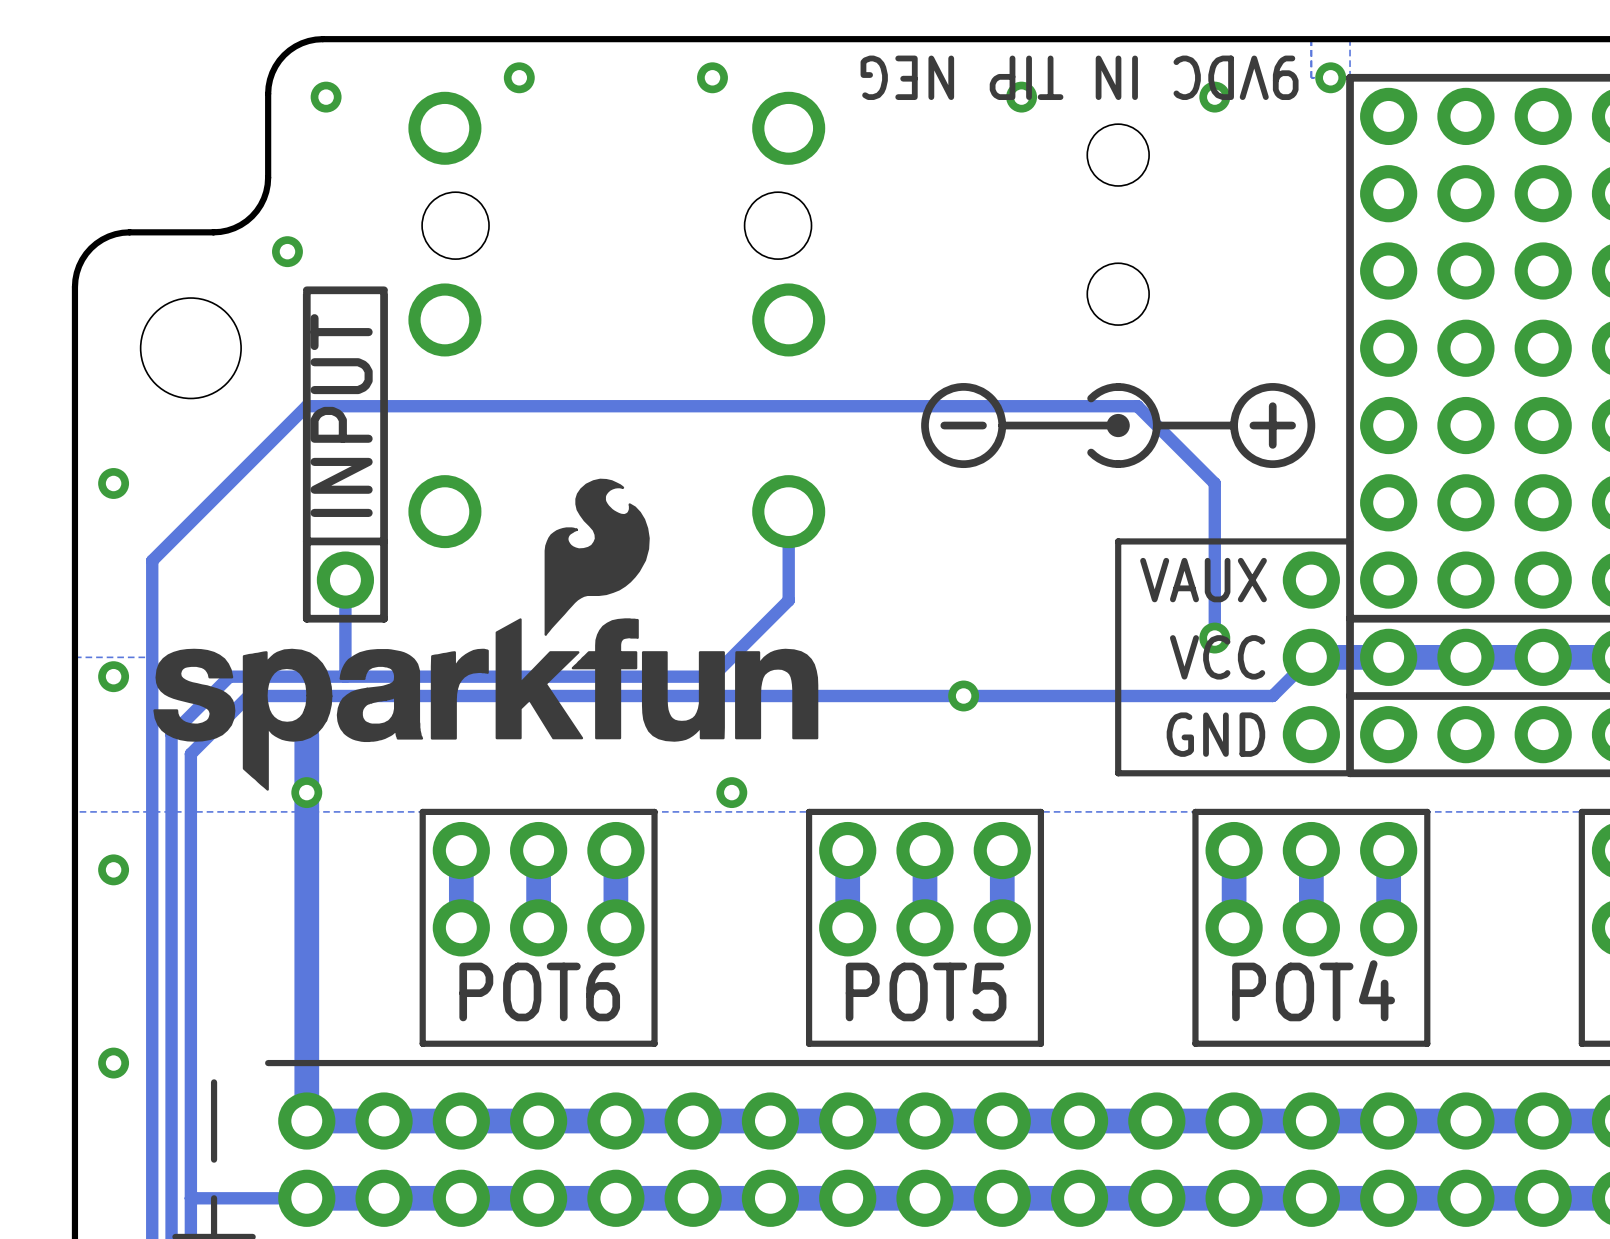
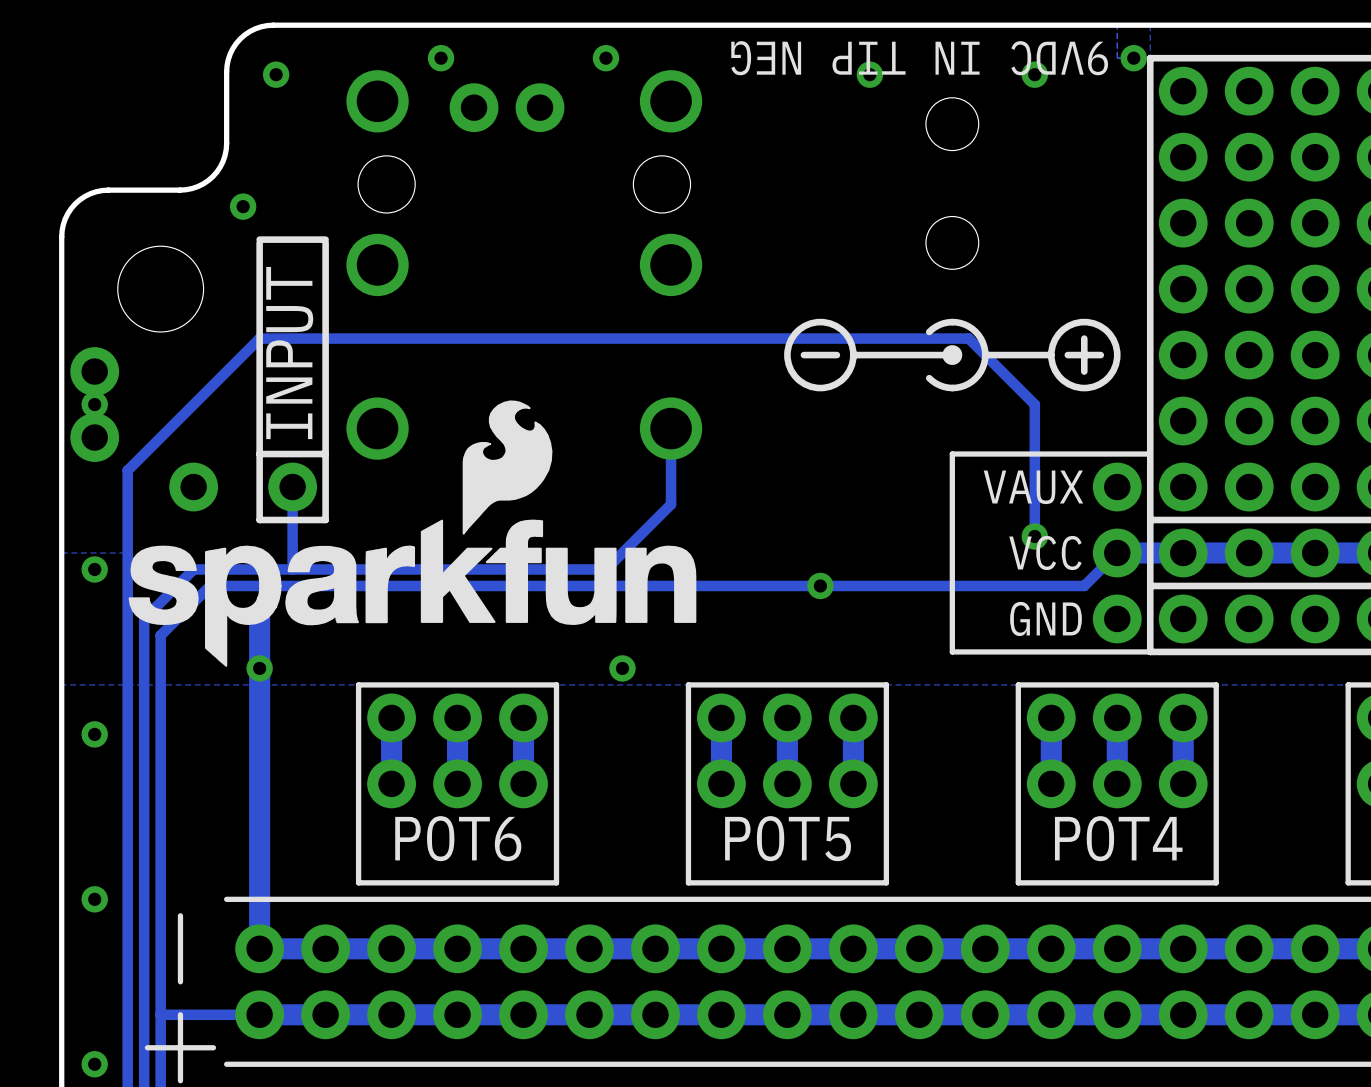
part: none -> (507, 107)
part: none -> (94, 404)
part: none -> (193, 487)

